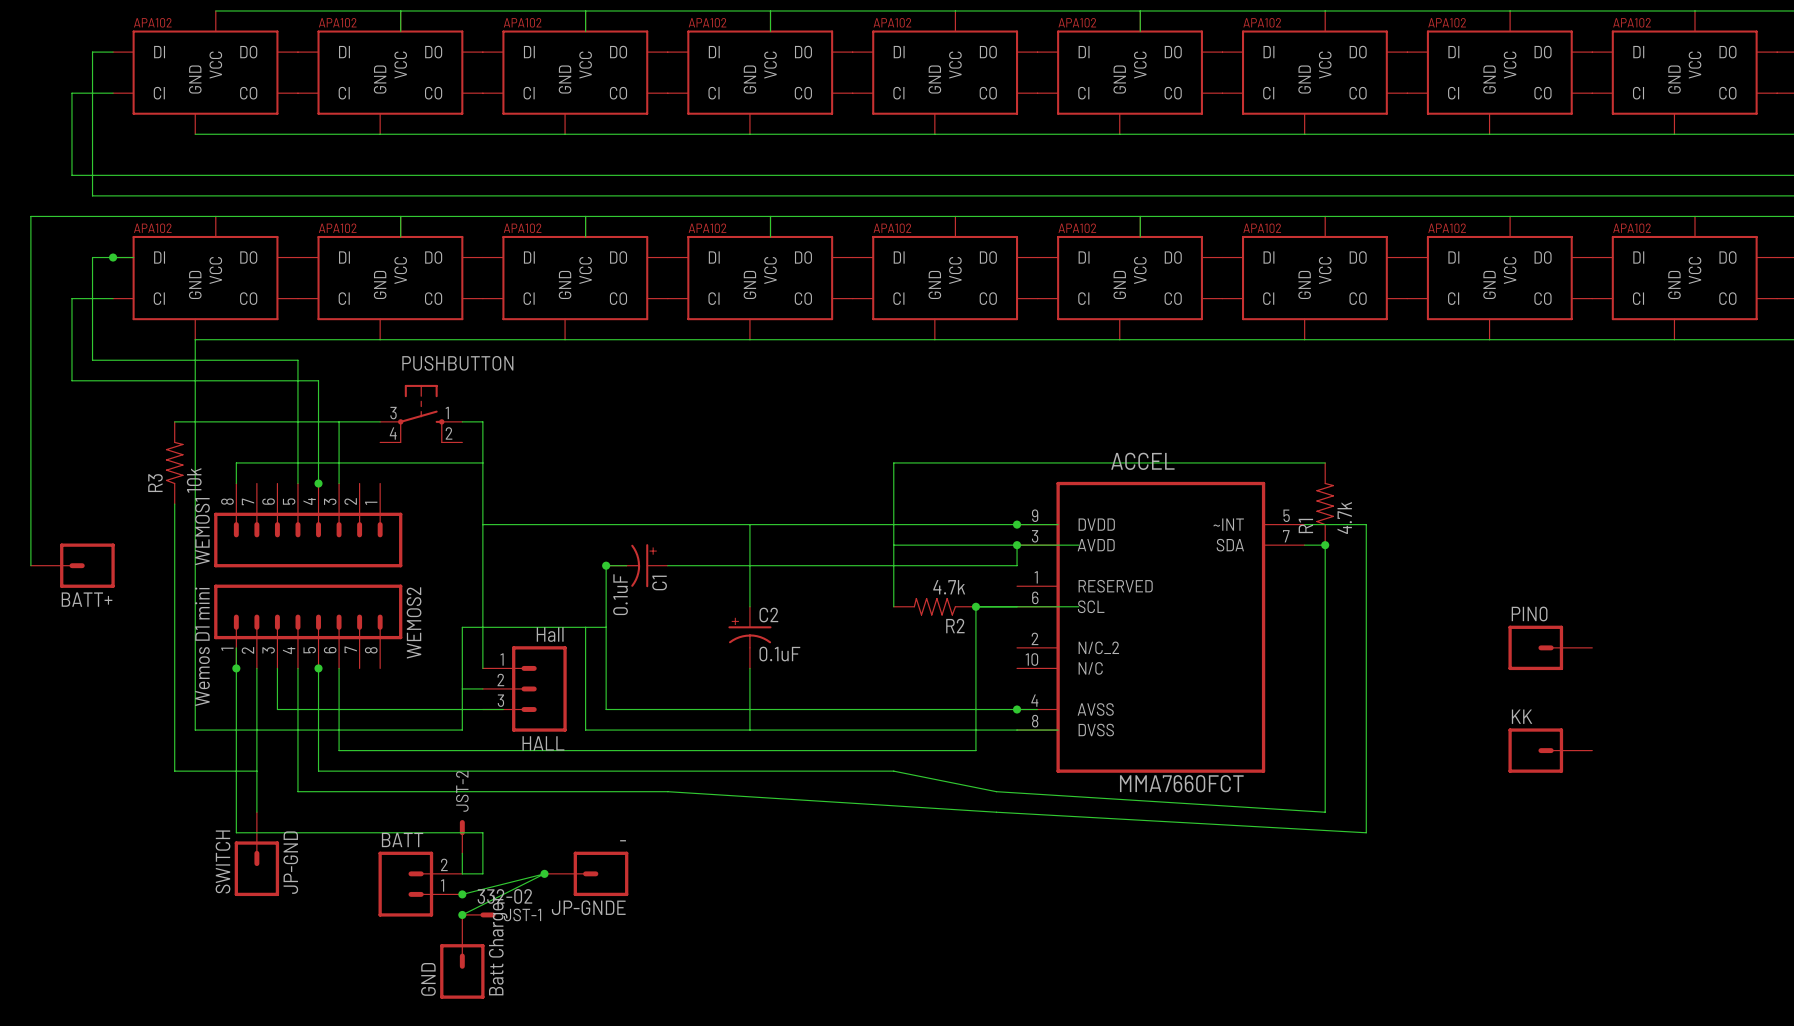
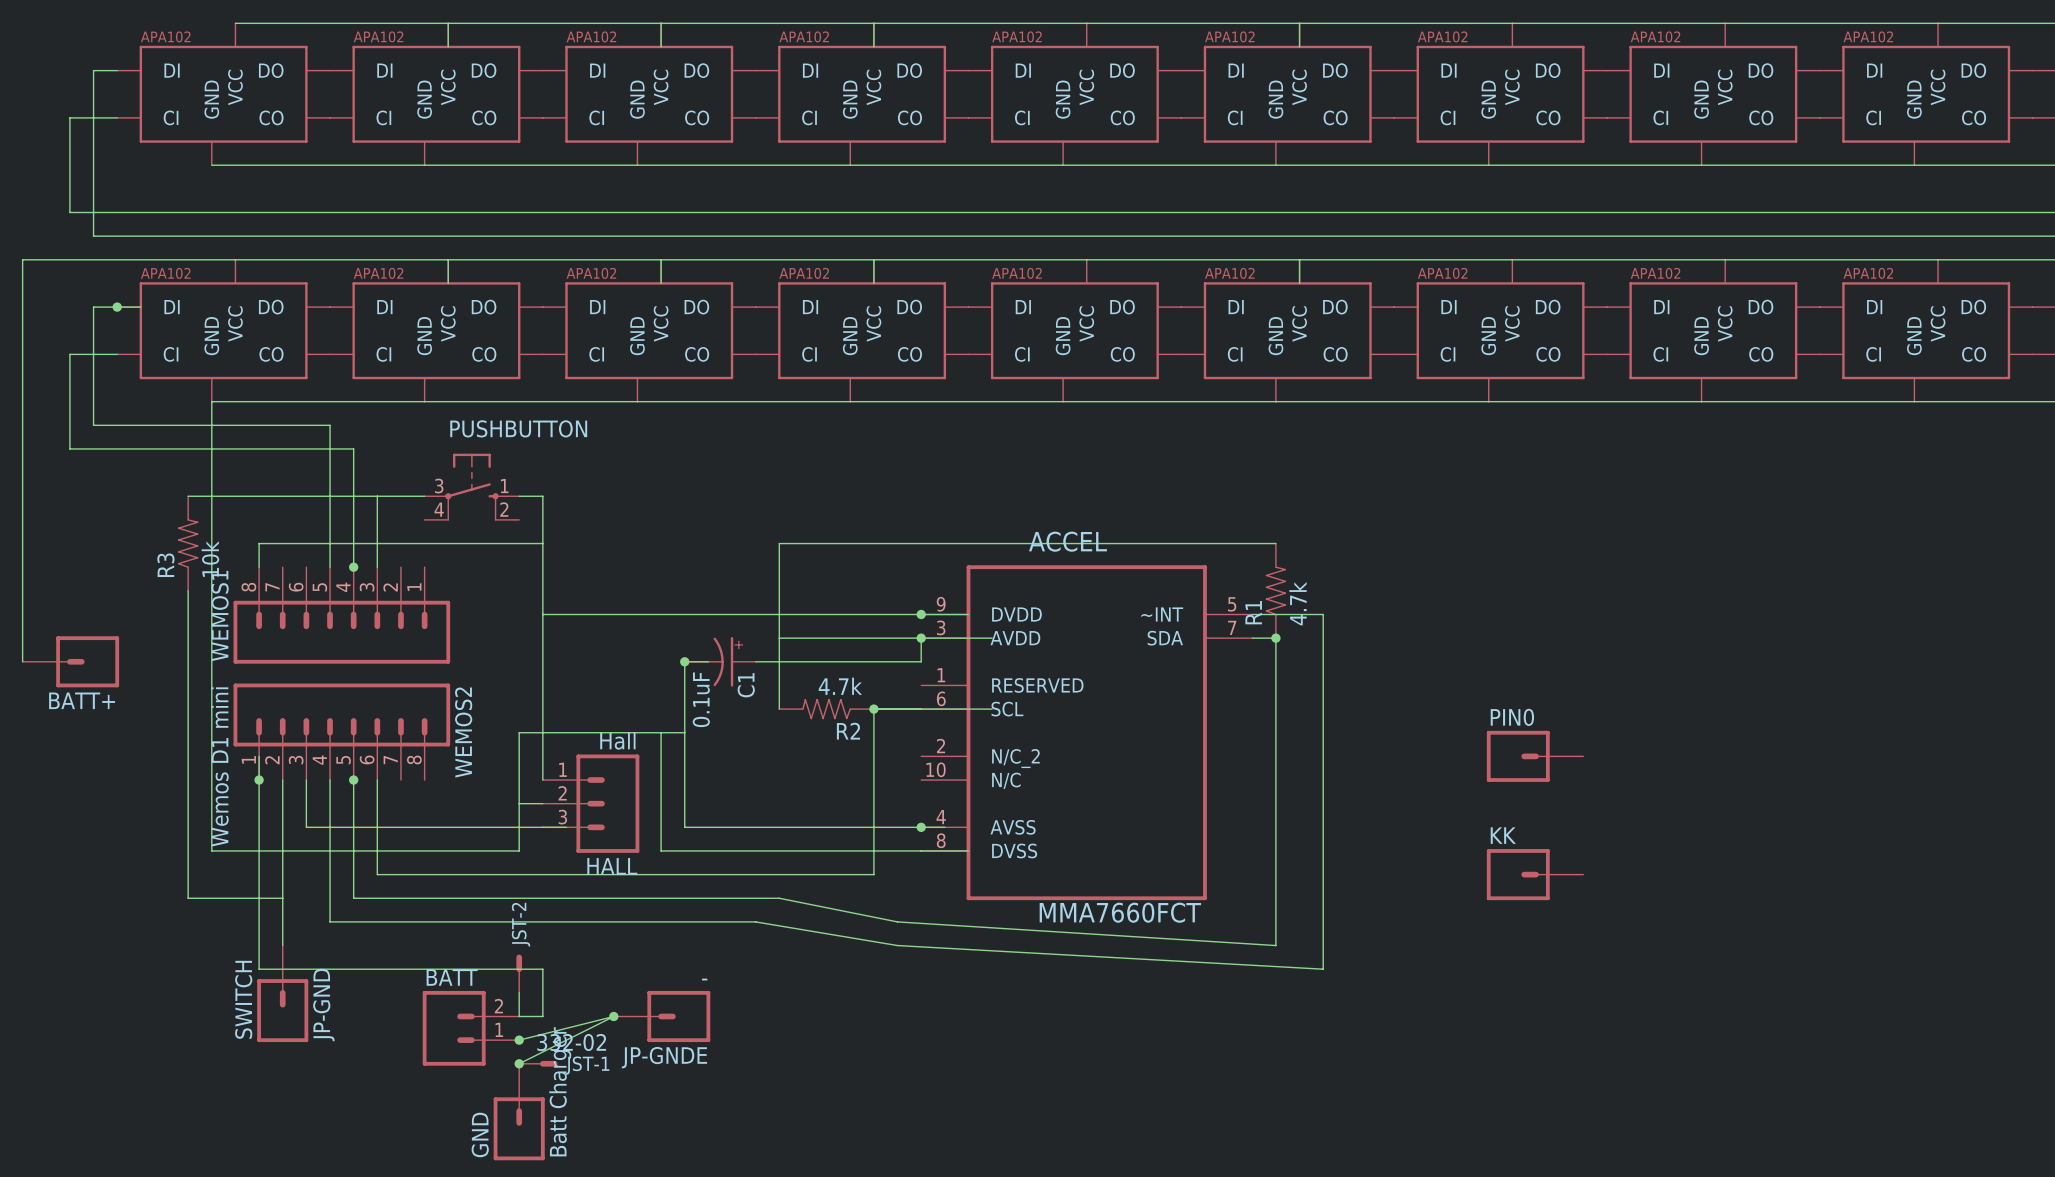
wire: (893, 462) (893, 606) -> (1015, 543) (779, 543) (779, 709)
wire: (1119, 462) (1325, 462) -> none
R1 position: (1325, 504) -> (1275, 590)
wire: (749, 524) (749, 606) -> none
junction: none -> (921, 614)
wire: (852, 524) (1058, 524) -> none
junction: (1017, 524) -> none
wire: (1304, 524) (1366, 524) (1366, 832) (667, 791) -> (1252, 614) (1323, 614) (1323, 969) (897, 945) (755, 921)
wire: none -> (779, 638) (992, 638)
junction: none -> (921, 638)
wire: (893, 545) (1078, 545) -> none
wire: (1017, 545) (1017, 565) (811, 565) -> (921, 638) (921, 661)
junction: (1017, 545) -> none
junction: none -> (1275, 638)
wire: (1304, 545) (1325, 545) (1325, 812) (996, 791) (893, 771) (688, 771) -> (1252, 638) (1275, 638) (1275, 945) (897, 921) (779, 898)
junction: (1325, 545) -> none
junction: none -> (873, 709)
R2 position: (934, 606) -> (826, 709)
junction: (975, 606) -> none
wire: (1078, 606) (975, 606) (975, 750) (770, 750) -> (992, 709) (873, 709) (873, 874)
ACCEL: none -> MMA7660FCT (1086, 732)
ACCEL: MMA7660FCT (1160, 627) -> none
C2: 0.1uF (749, 637) -> none
PIN0 position: (1550, 647) -> (1535, 756)
wire: (749, 668) (749, 730) -> none
junction: none -> (921, 827)
wire: (832, 709) (1037, 709) -> none
junction: (1017, 709) -> none
wire: (852, 730) (1058, 730) -> none
KK: none -> (1535, 874)
KK: (1550, 750) -> none

